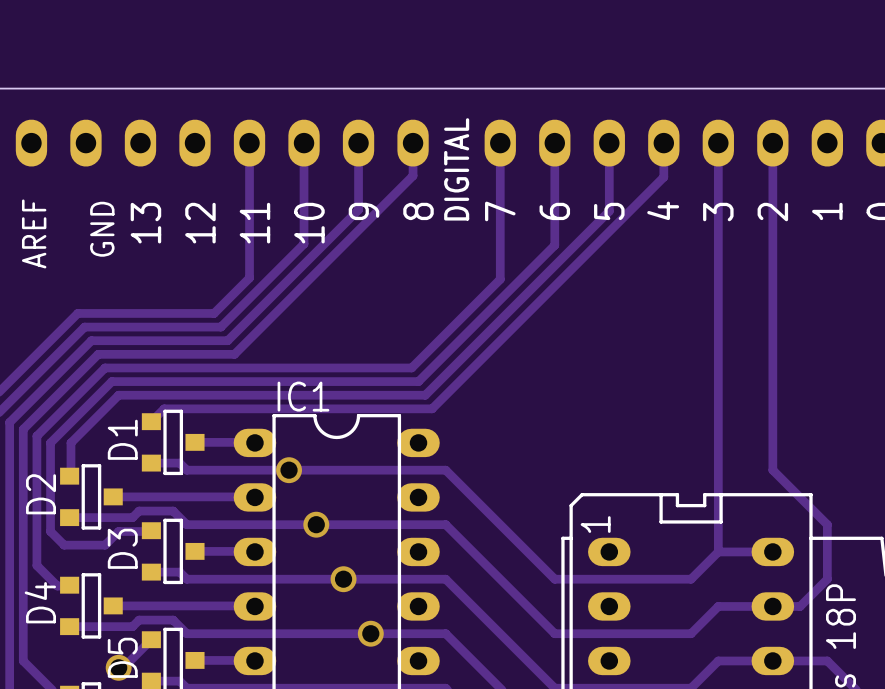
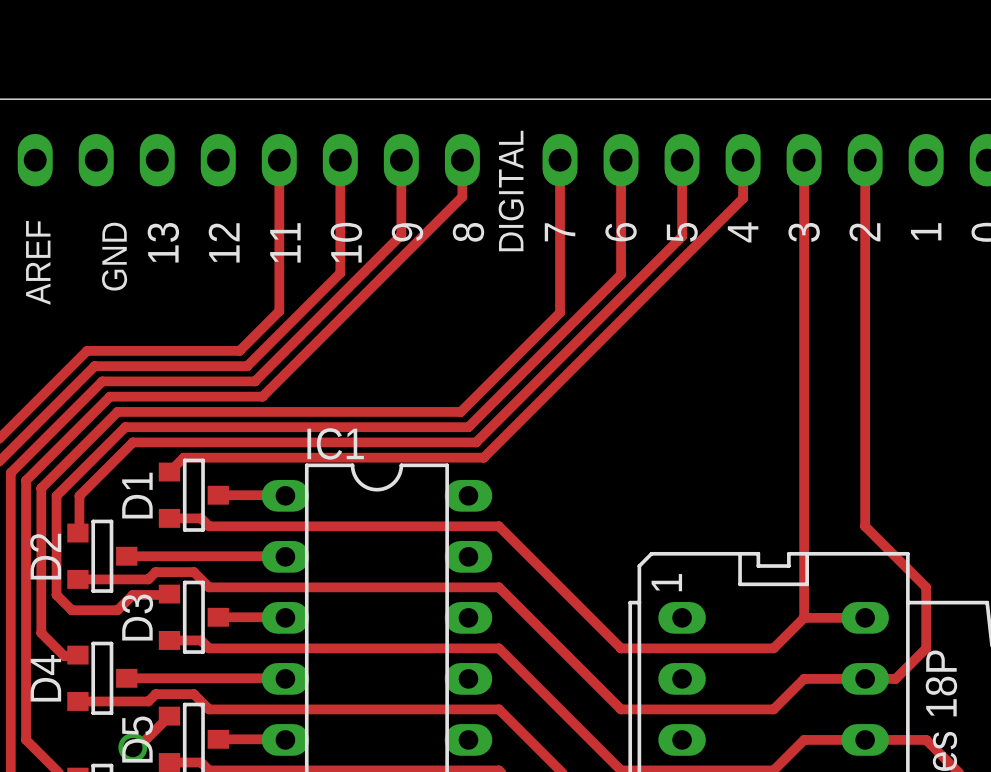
via: (289, 470) -> none
via: (316, 524) -> none
via: (343, 579) -> none
via: (370, 633) -> none

